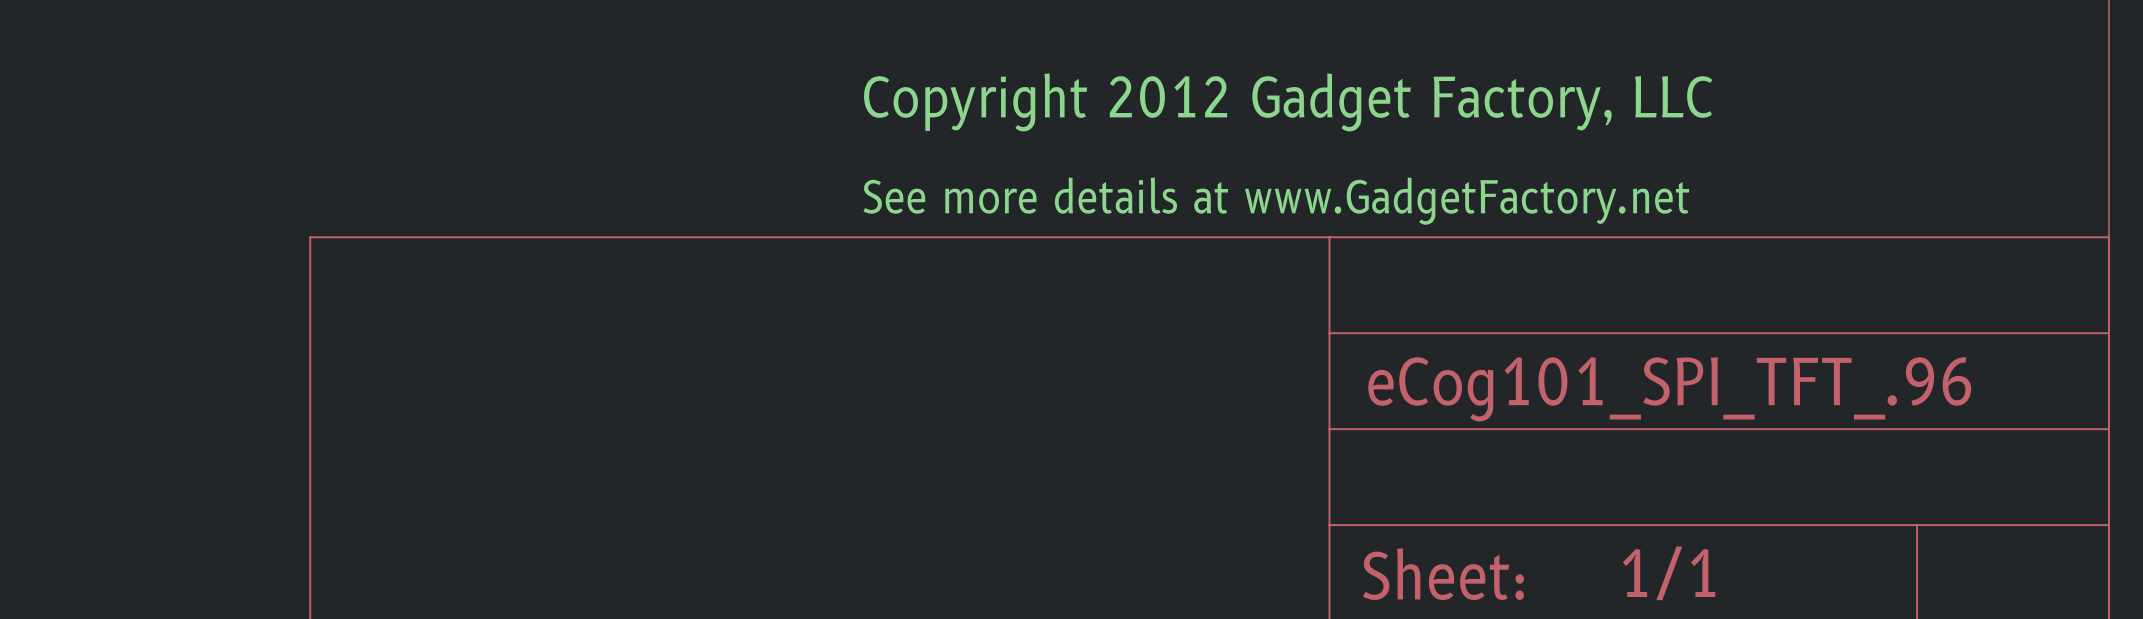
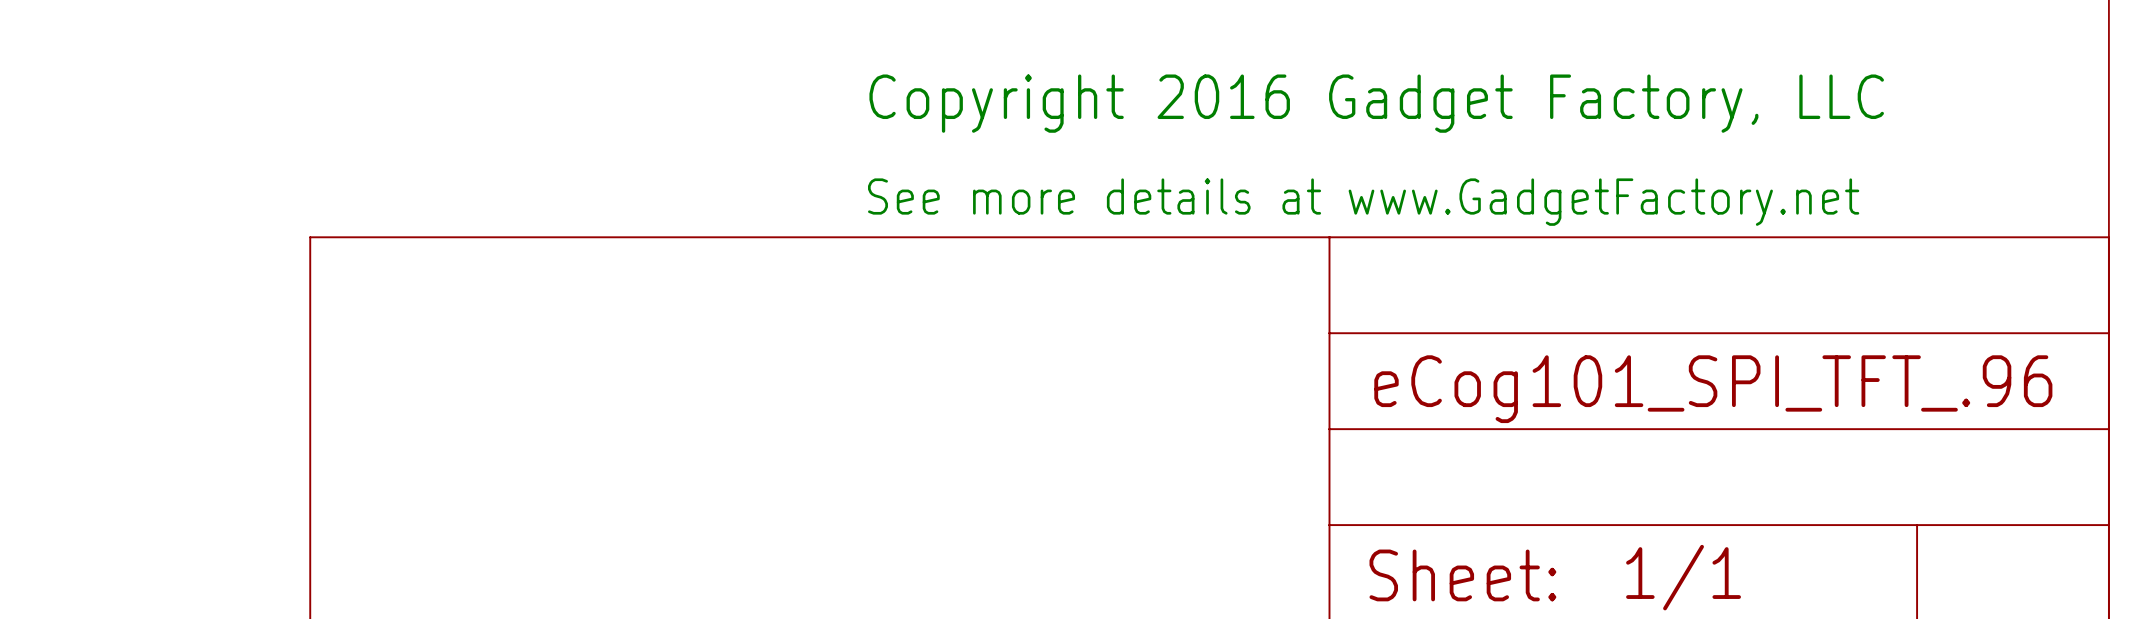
text: Copyright 2012 Gadget Factory, LLC (1288, 102) -> Copyright 2016 Gadget Factory, LLC (1376, 103)

